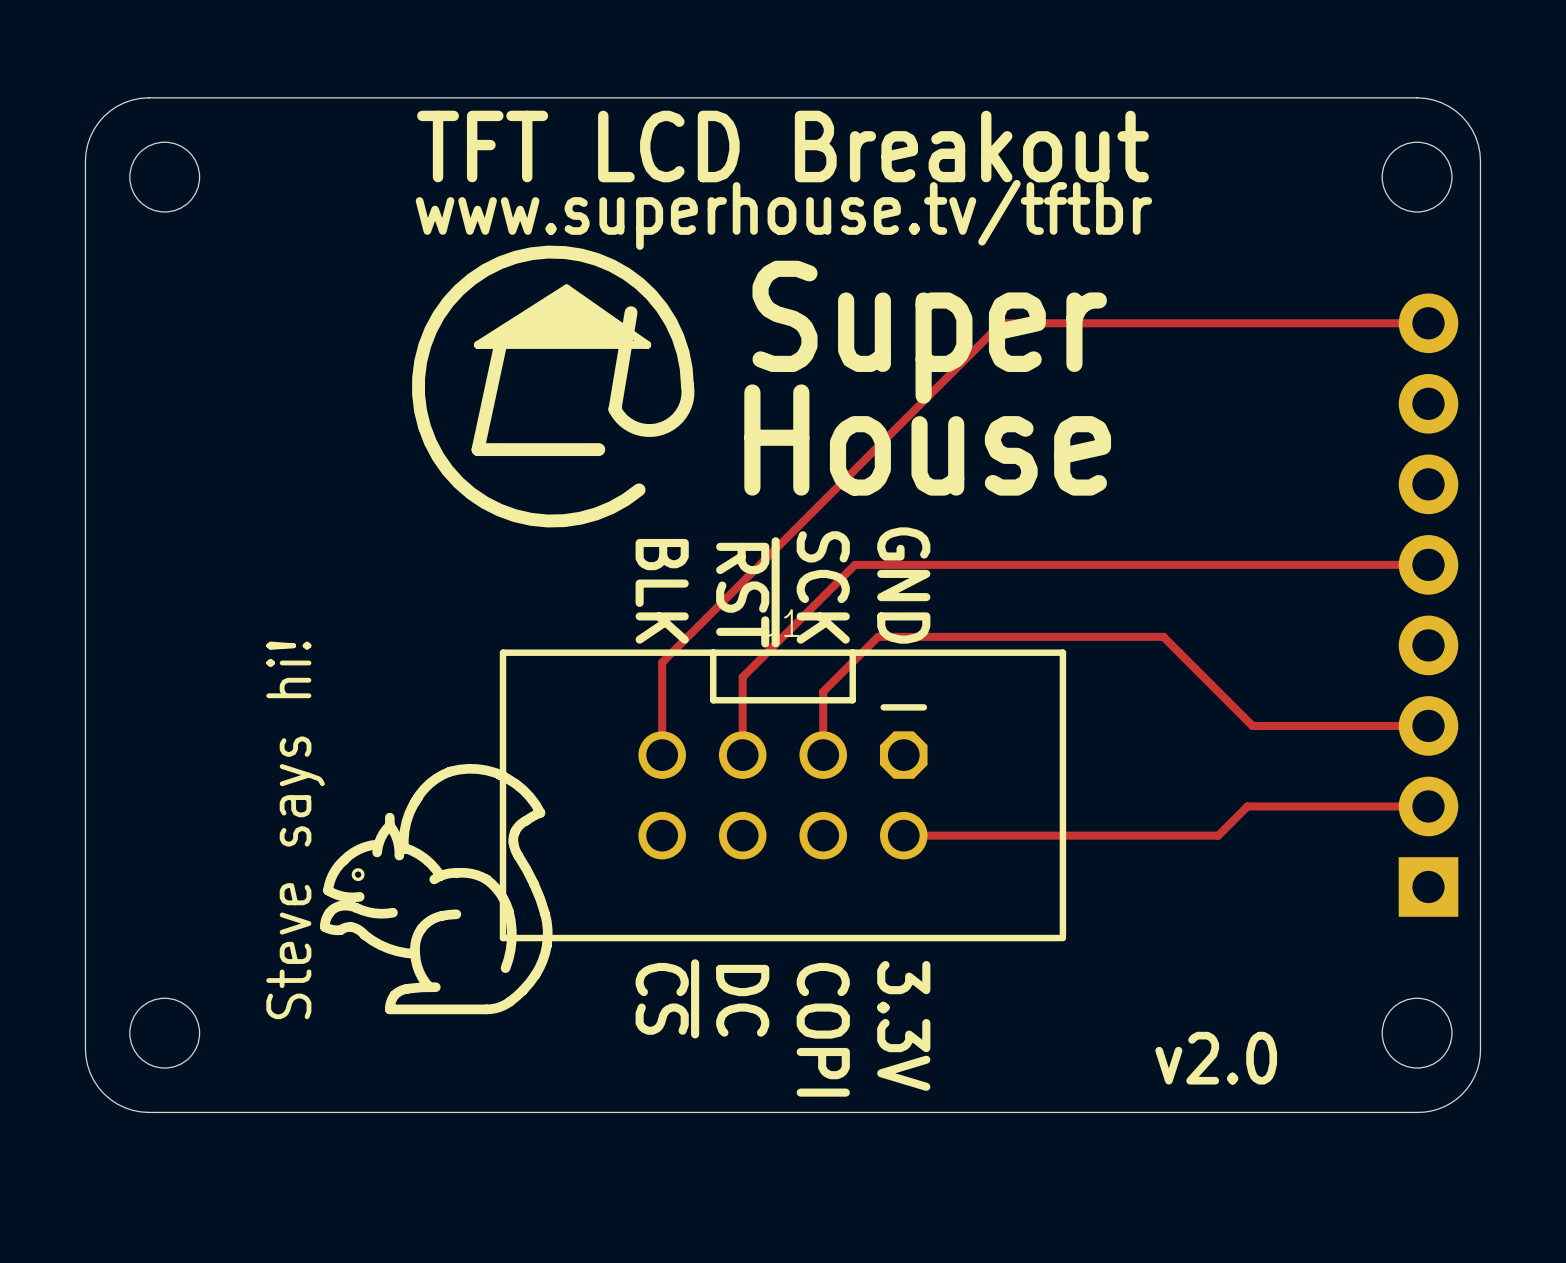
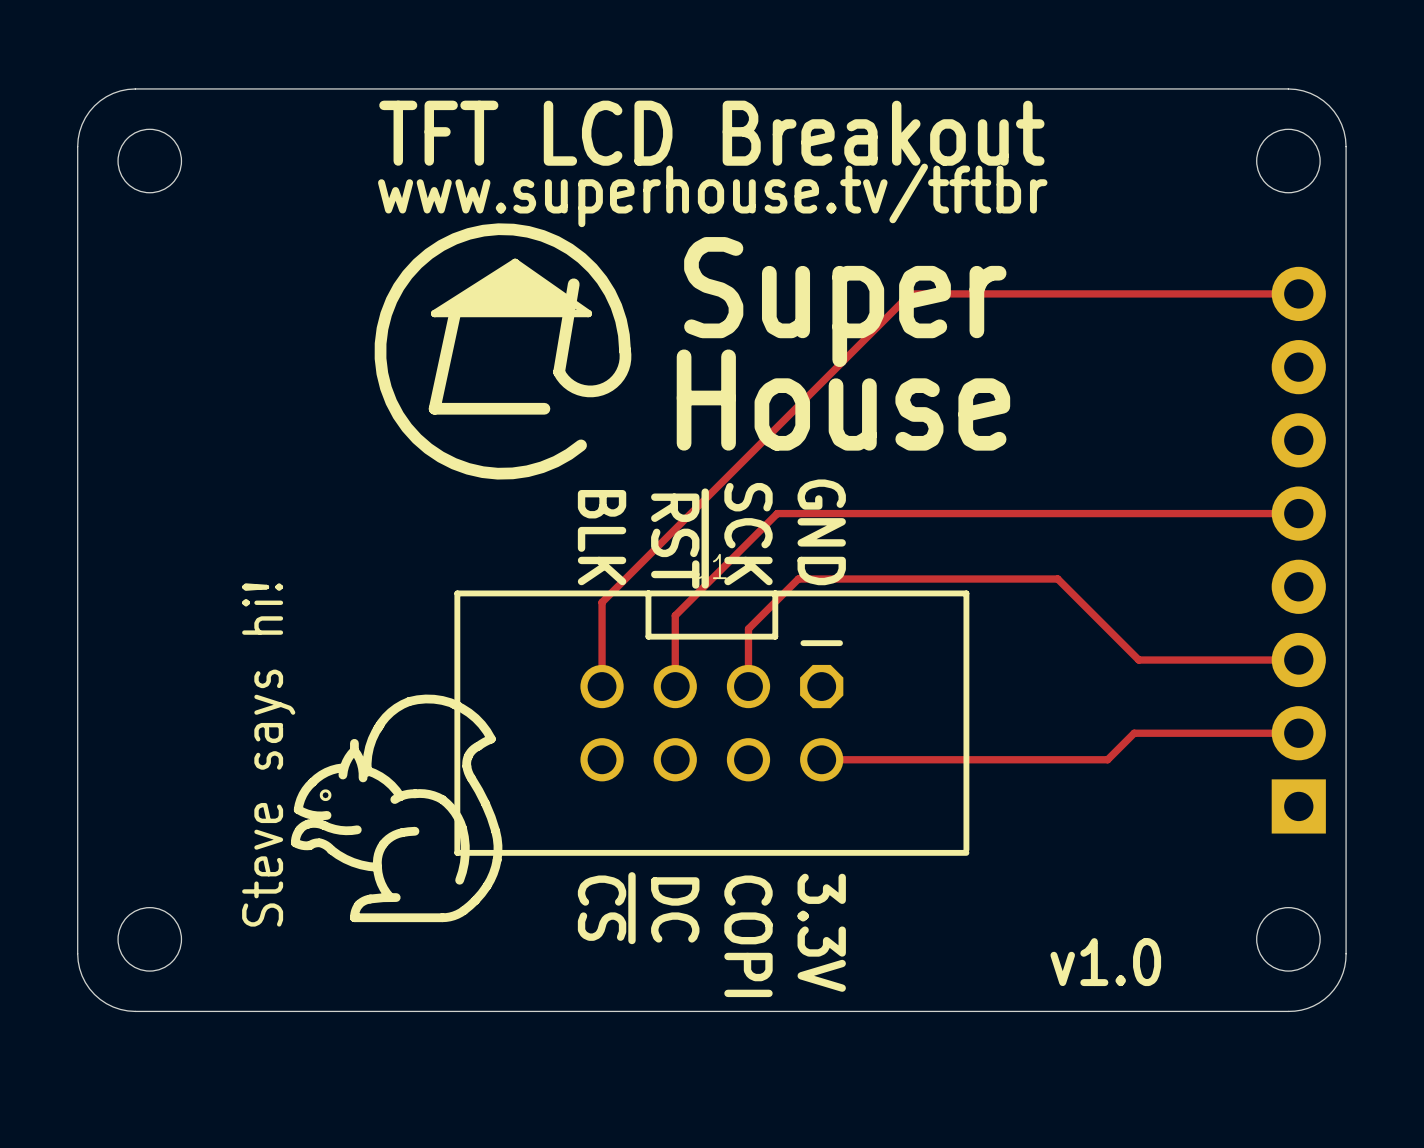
text: v2.0 (1216, 1058) -> v1.0 (1105, 962)

